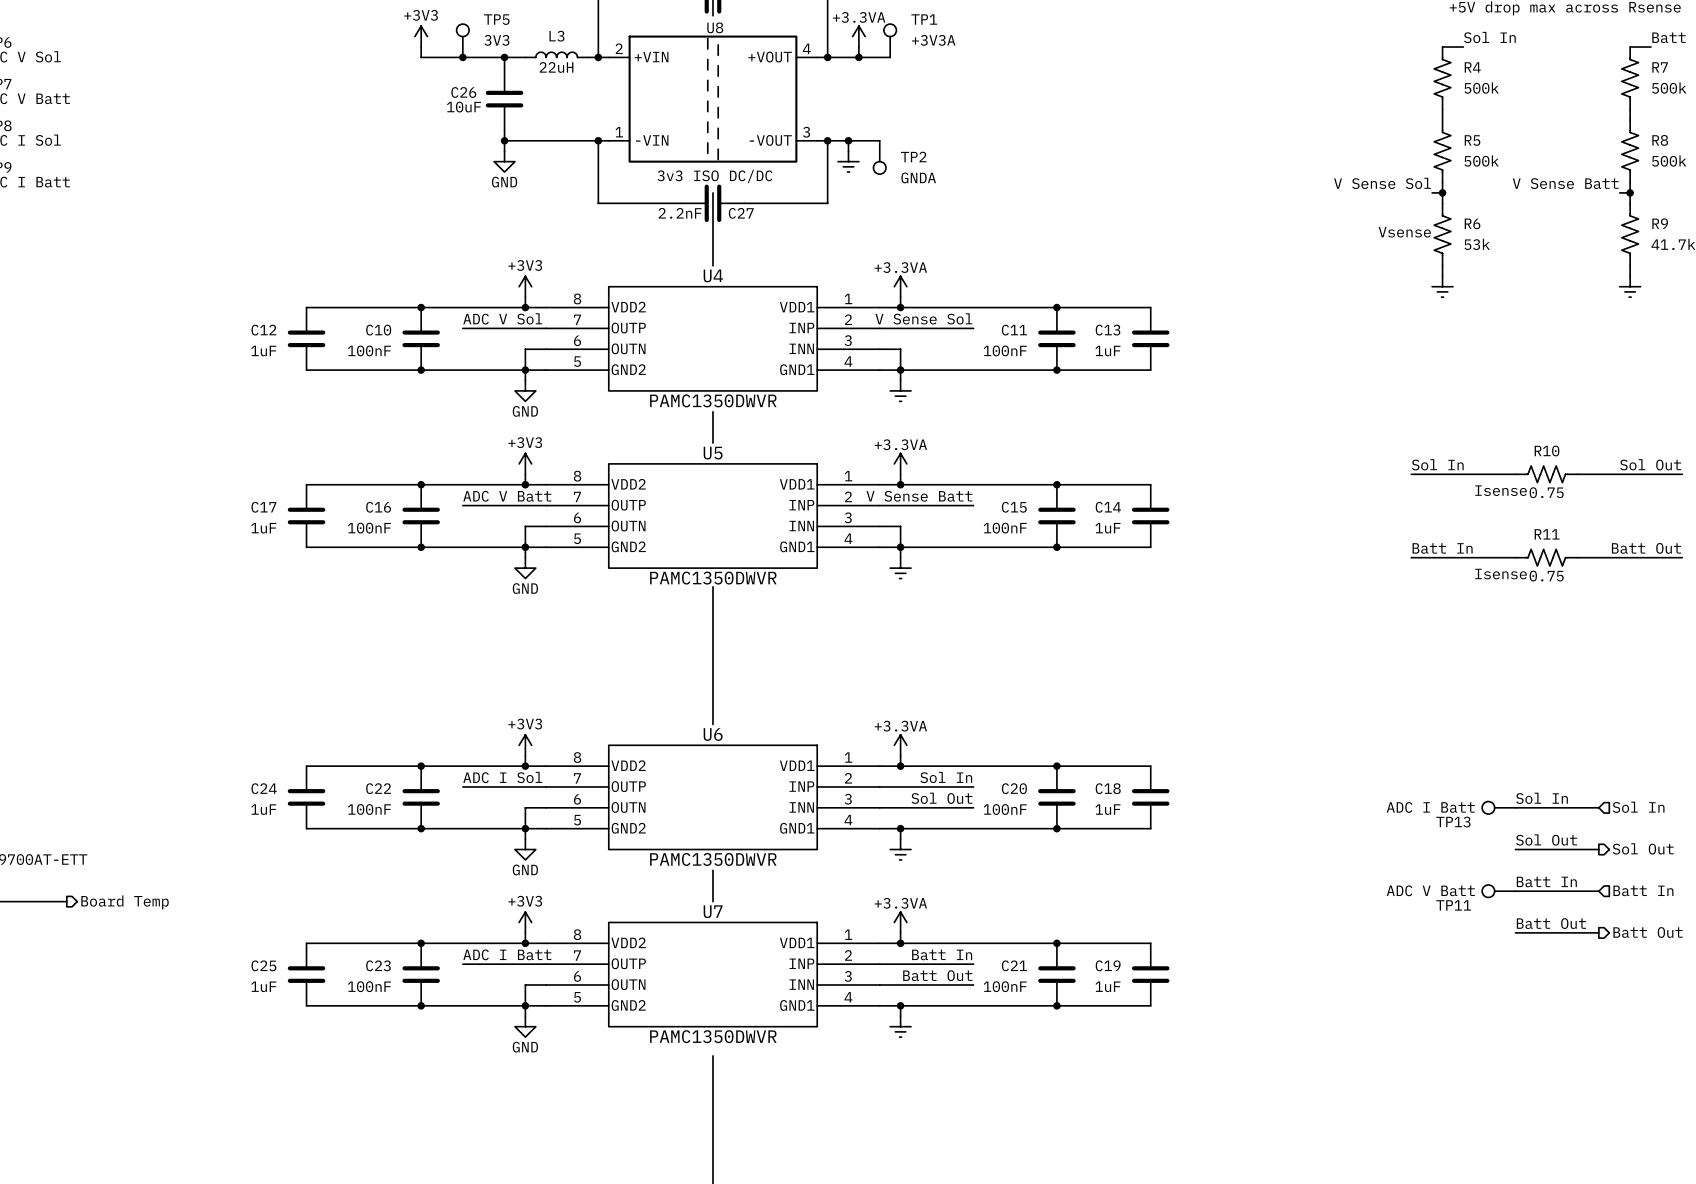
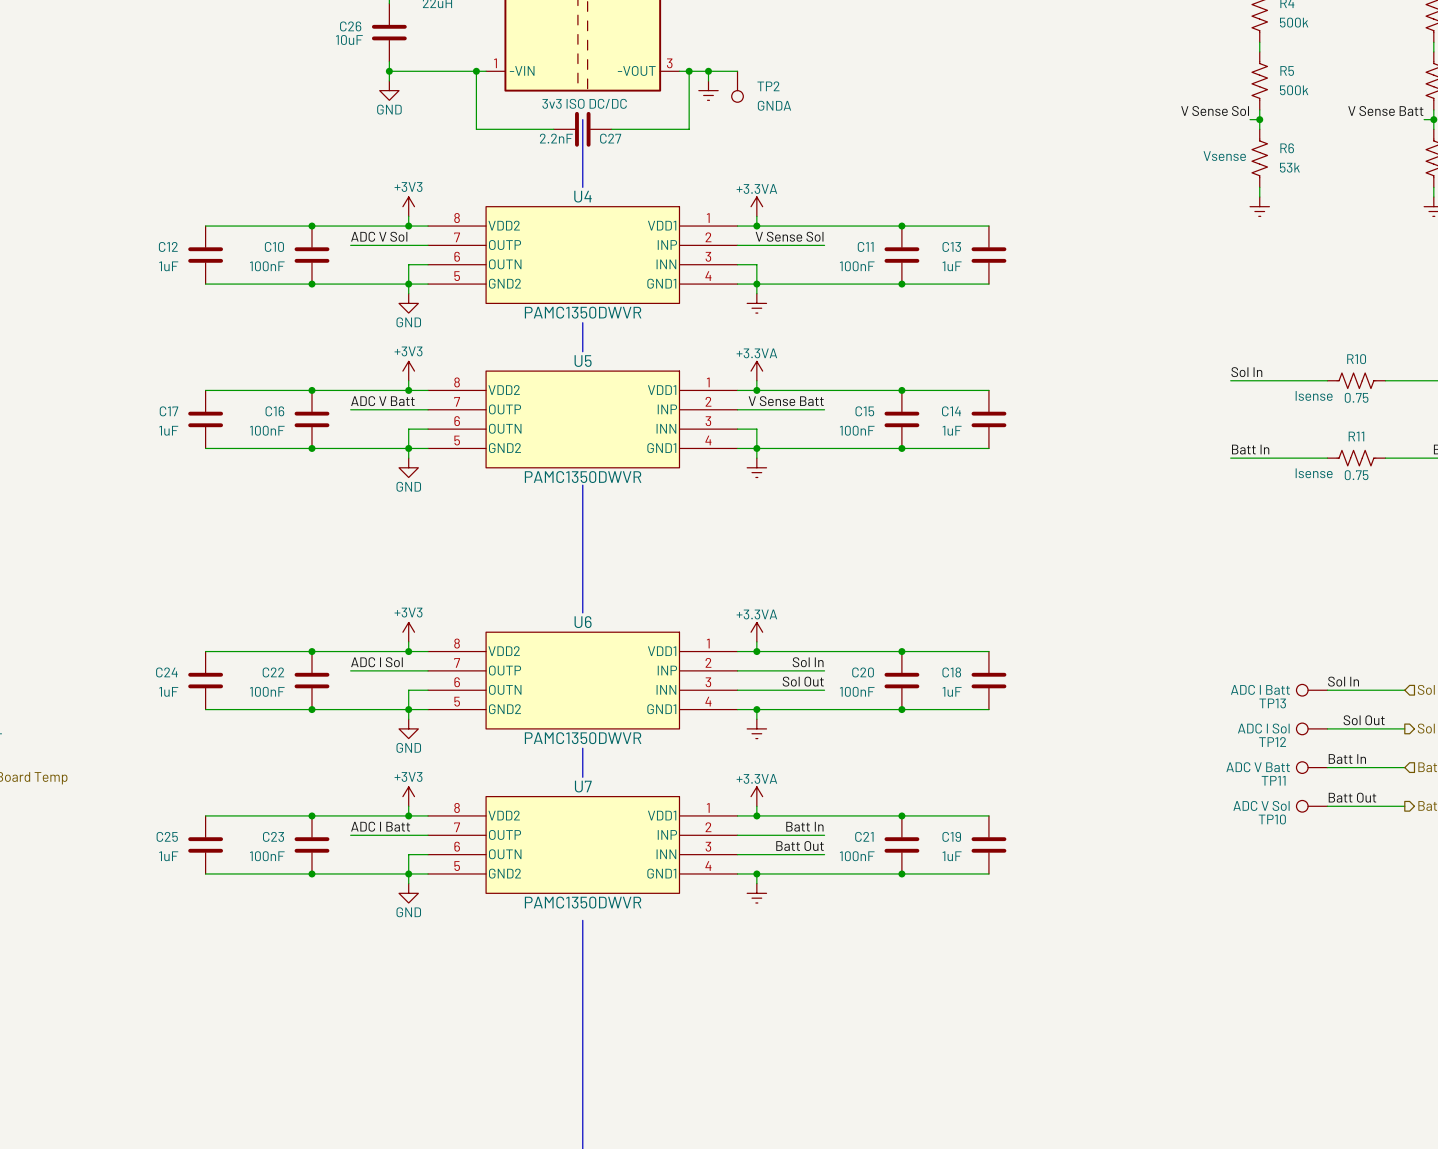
label position: Sol Out (1546, 839) -> Sol Out (1364, 720)
TP12: none -> ADC I Sol (1311, 728)
TP10: none -> ADC V Sol (1311, 806)

